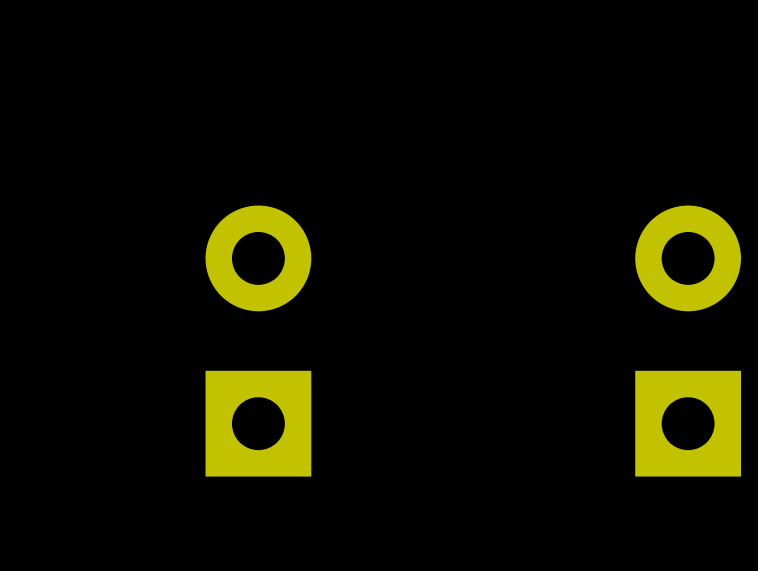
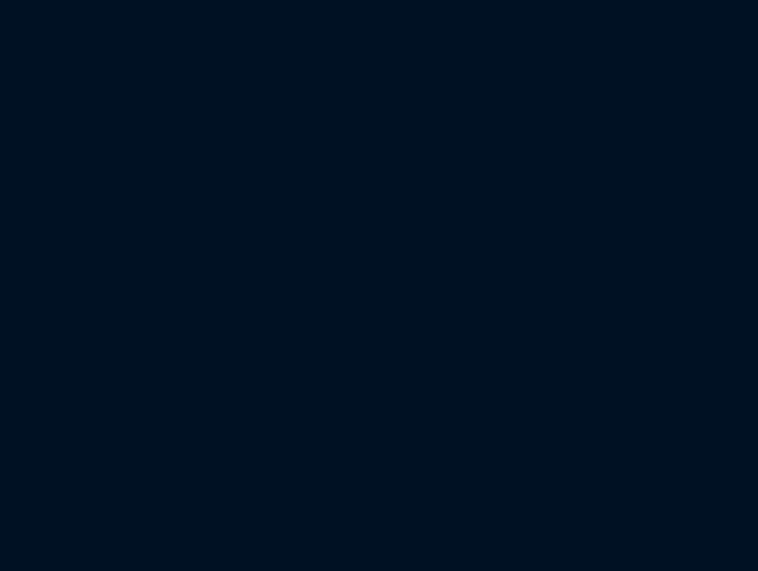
part: (258, 341) -> none
part: (688, 341) -> none

